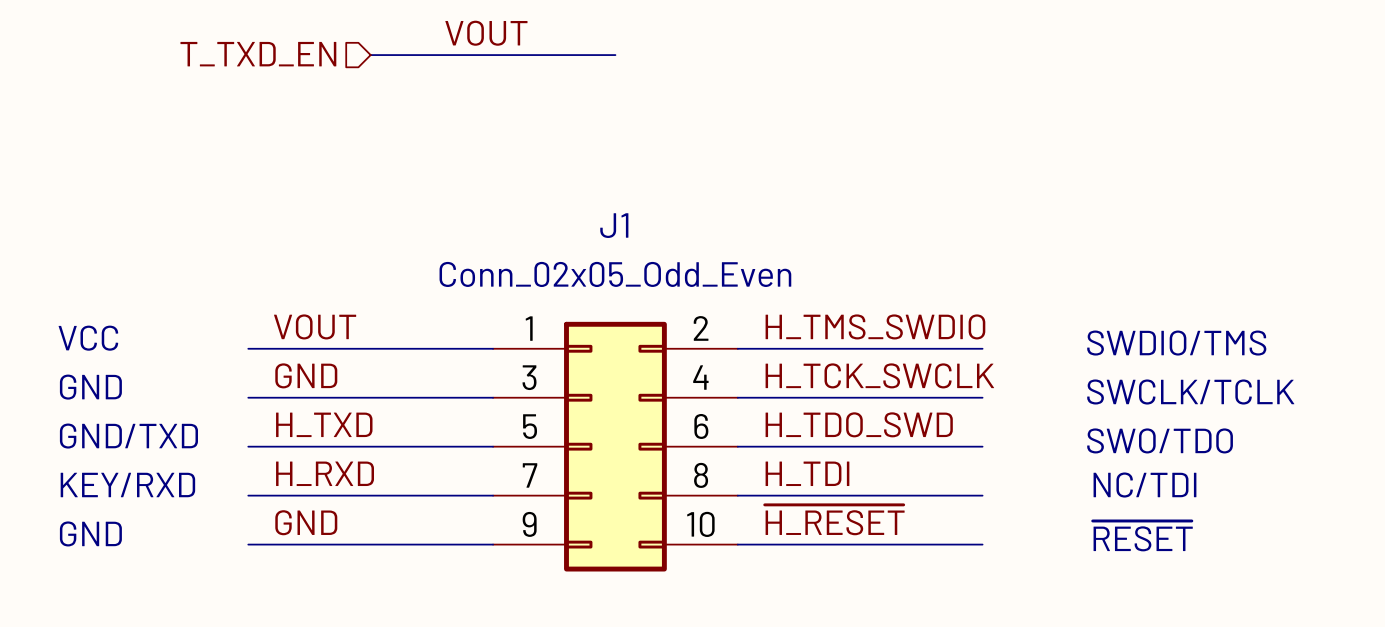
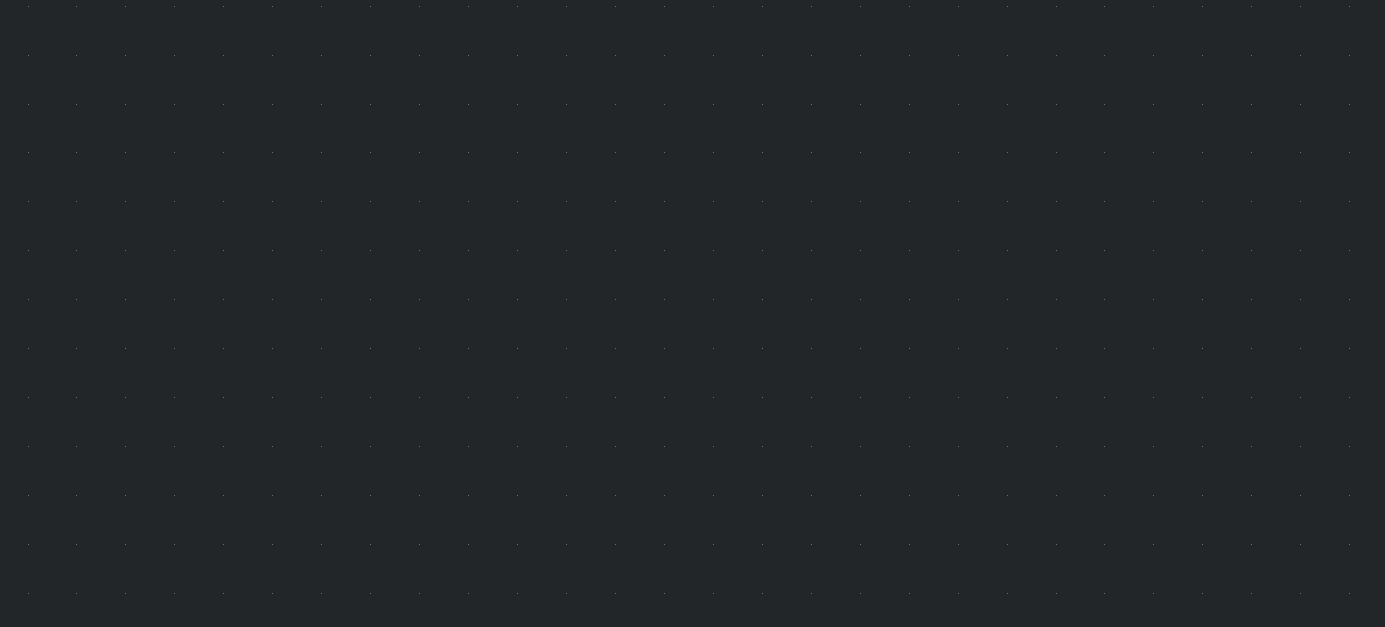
label: VOUT (486, 33) -> none
hierarchical label: T_TXD_EN (258, 54) -> none
wire: (370, 55) (615, 55) -> none
label: VOUT (315, 326) -> none
label: H_TMS_SWDIO (875, 326) -> none
text: VCC (88, 338) -> none
text: SWDIO/TMS (1176, 343) -> none
wire: (248, 348) (493, 348) -> none
wire: (737, 348) (982, 348) -> none
label: GND (306, 375) -> none
label: H_TCK_SWCLK (879, 375) -> none
text: GND (90, 387) -> none
text: SWCLK/TCLK (1190, 392) -> none
wire: (248, 397) (493, 397) -> none
wire: (737, 397) (982, 397) -> none
label: H_TXD (324, 424) -> none
label: H_TDO_SWD (859, 424) -> none
text: GND/TXD (128, 436) -> none
text: SWO/TDO (1160, 440) -> none
wire: (248, 446) (493, 446) -> none
J1: Conn_02x05_Odd_Even (615, 446) -> none
wire: (737, 446) (982, 446) -> none
label: H_RXD (325, 473) -> none
label: H_TDI (807, 473) -> none
text: KEY/RXD (127, 485) -> none
text: NC/TDI (1144, 485) -> none
wire: (248, 495) (493, 495) -> none
wire: (737, 495) (982, 495) -> none
label: ~{H_RESET} (834, 520) -> none
label: GND (306, 522) -> none
text: GND (90, 533) -> none
text: ~{RESET} (1142, 536) -> none
wire: (248, 544) (493, 544) -> none
wire: (737, 544) (982, 544) -> none

